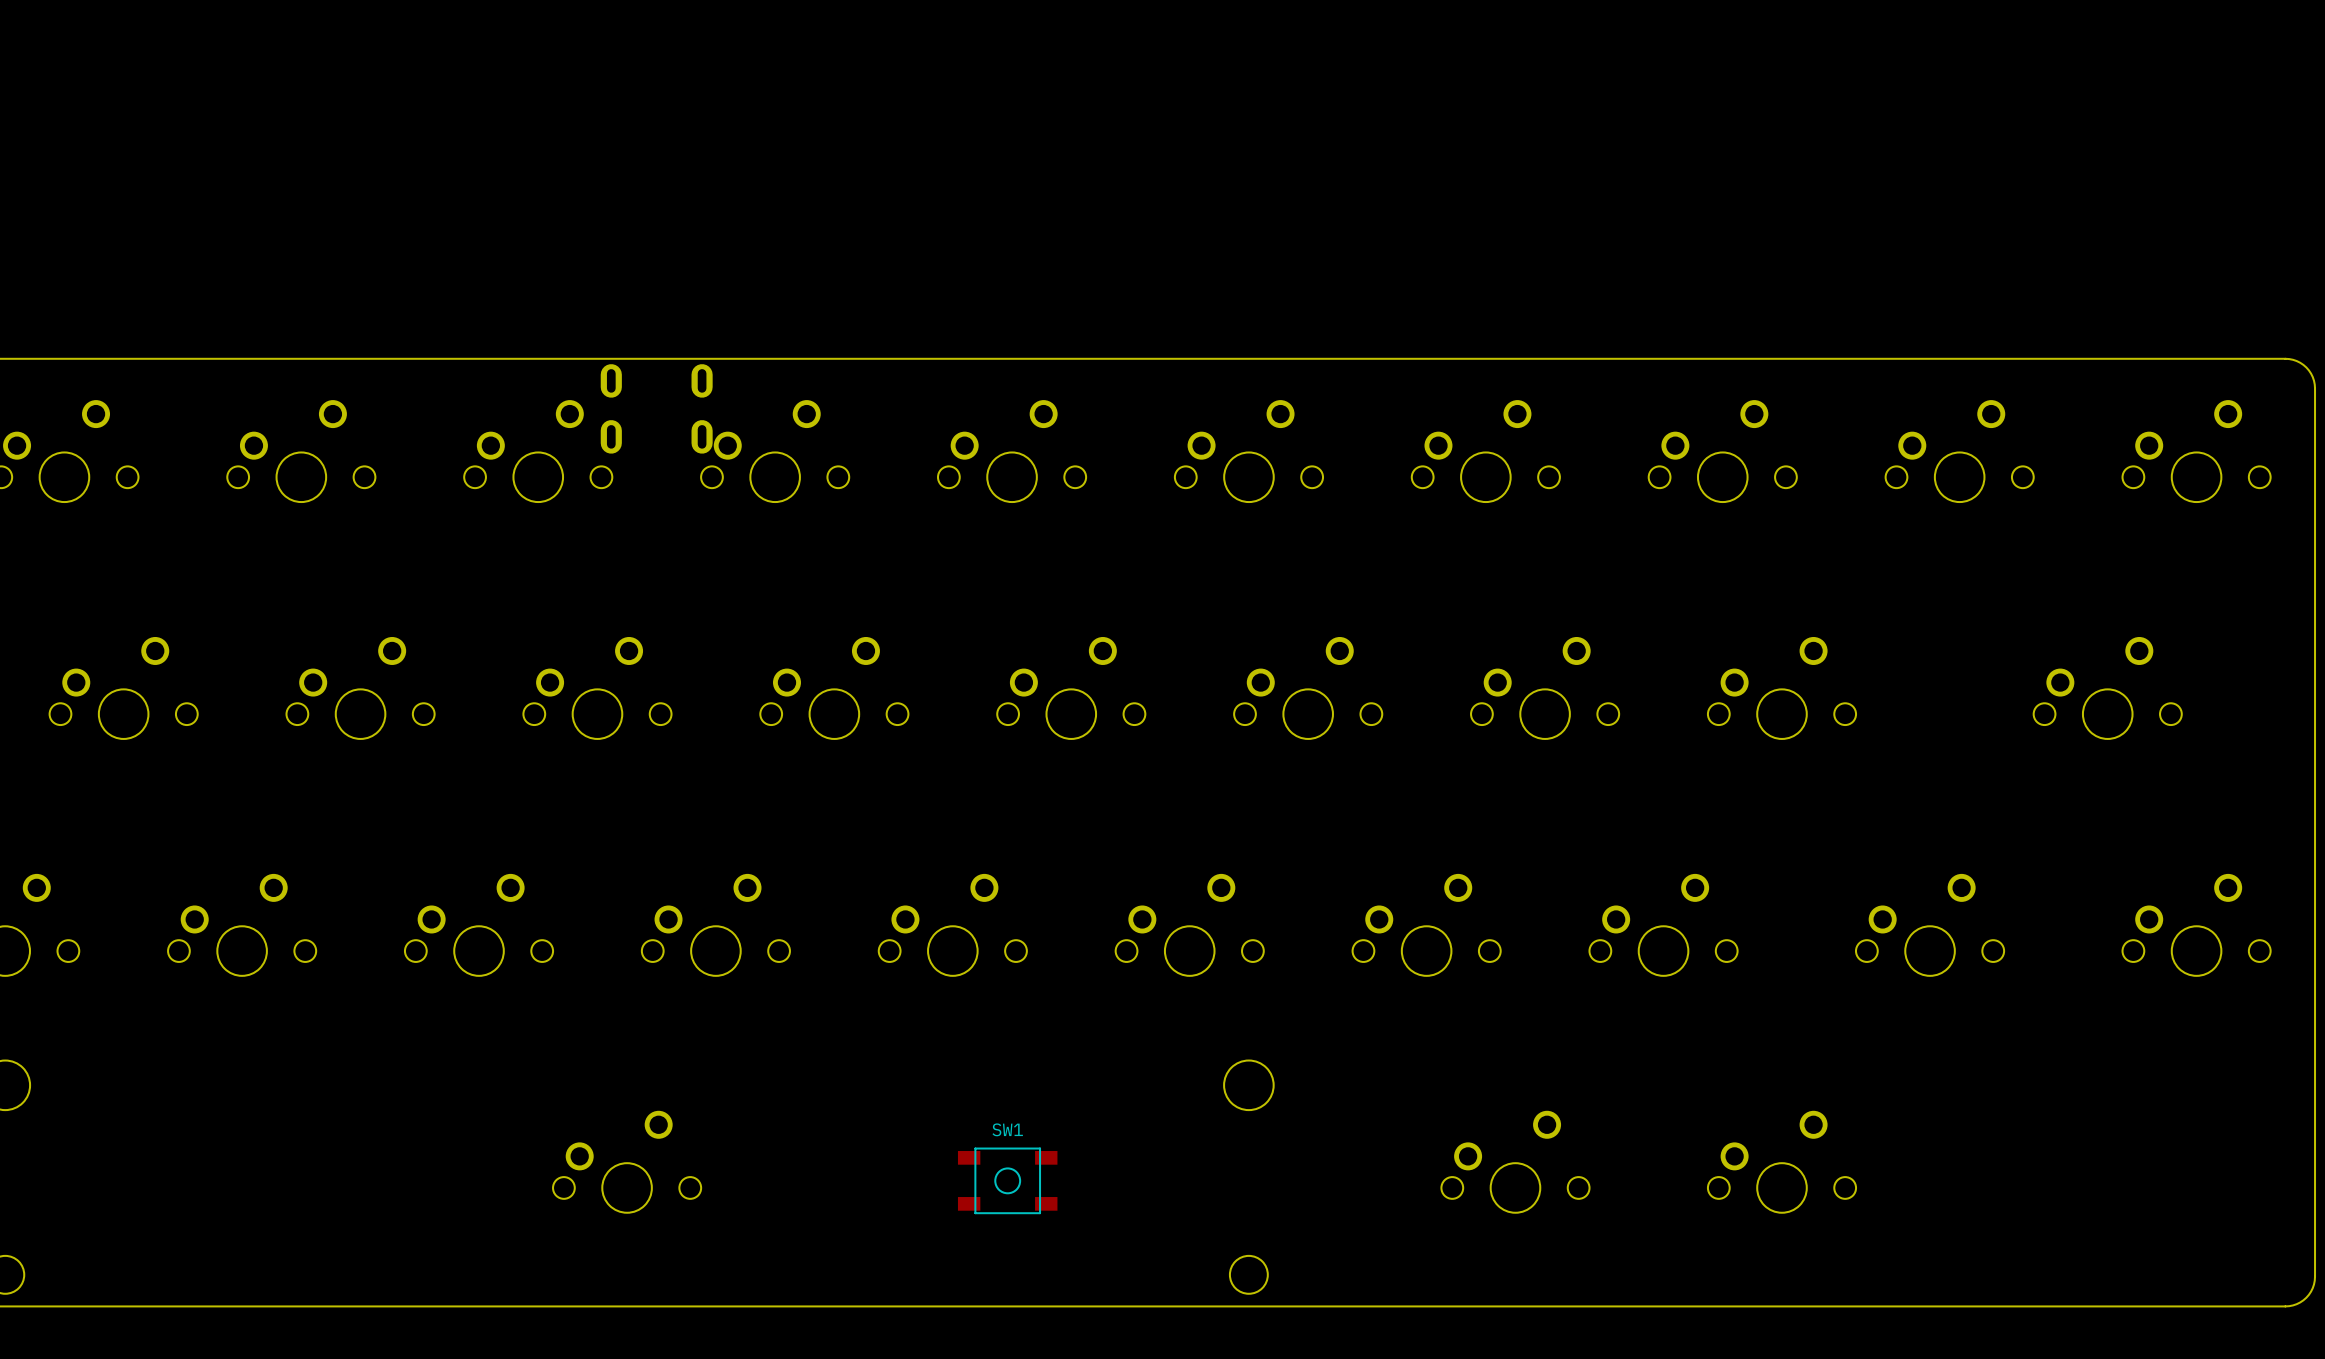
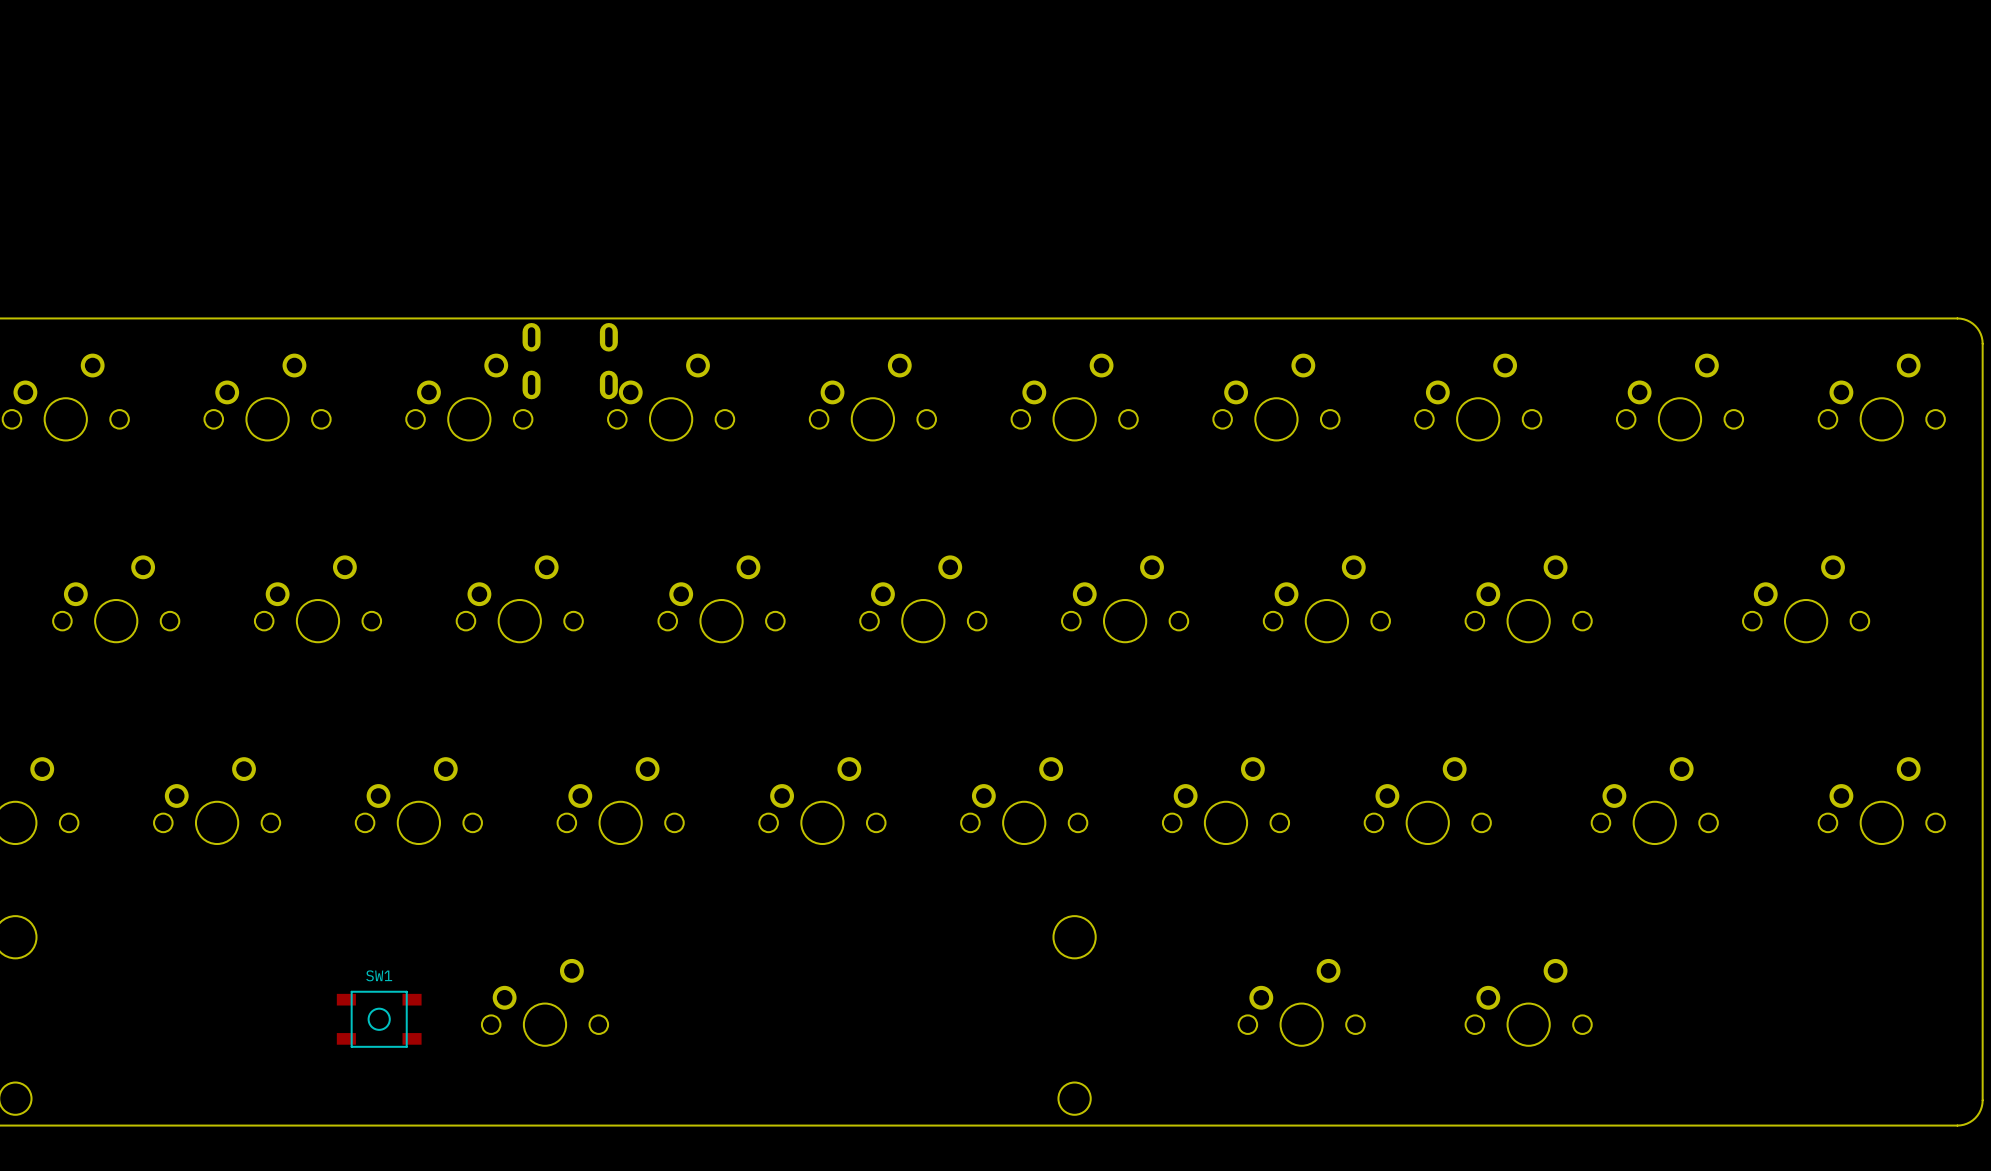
SW1 position: (1007, 1180) -> (379, 1019)

